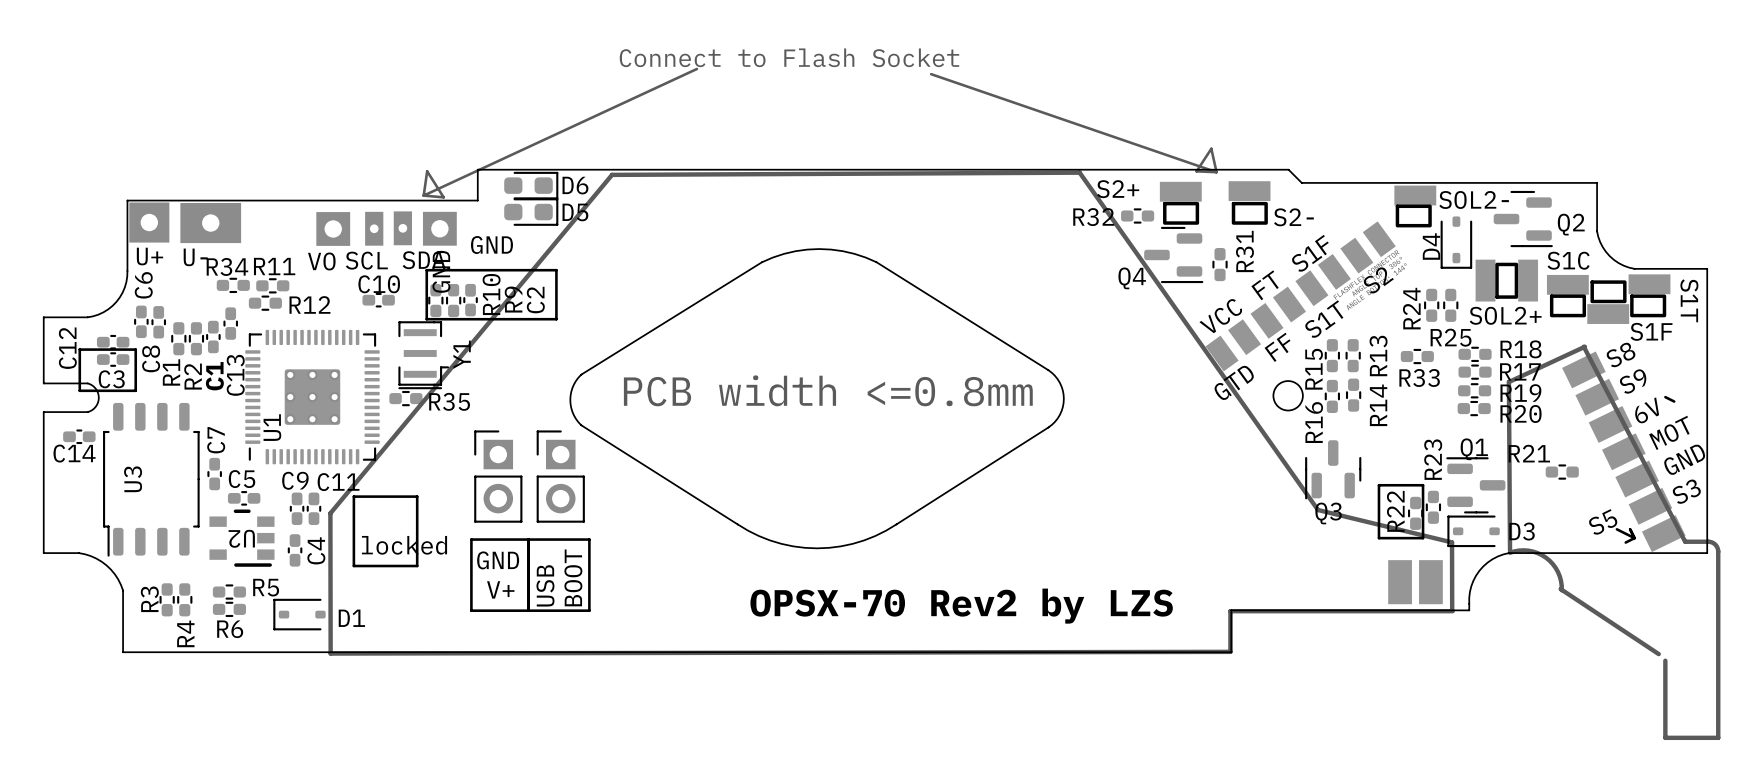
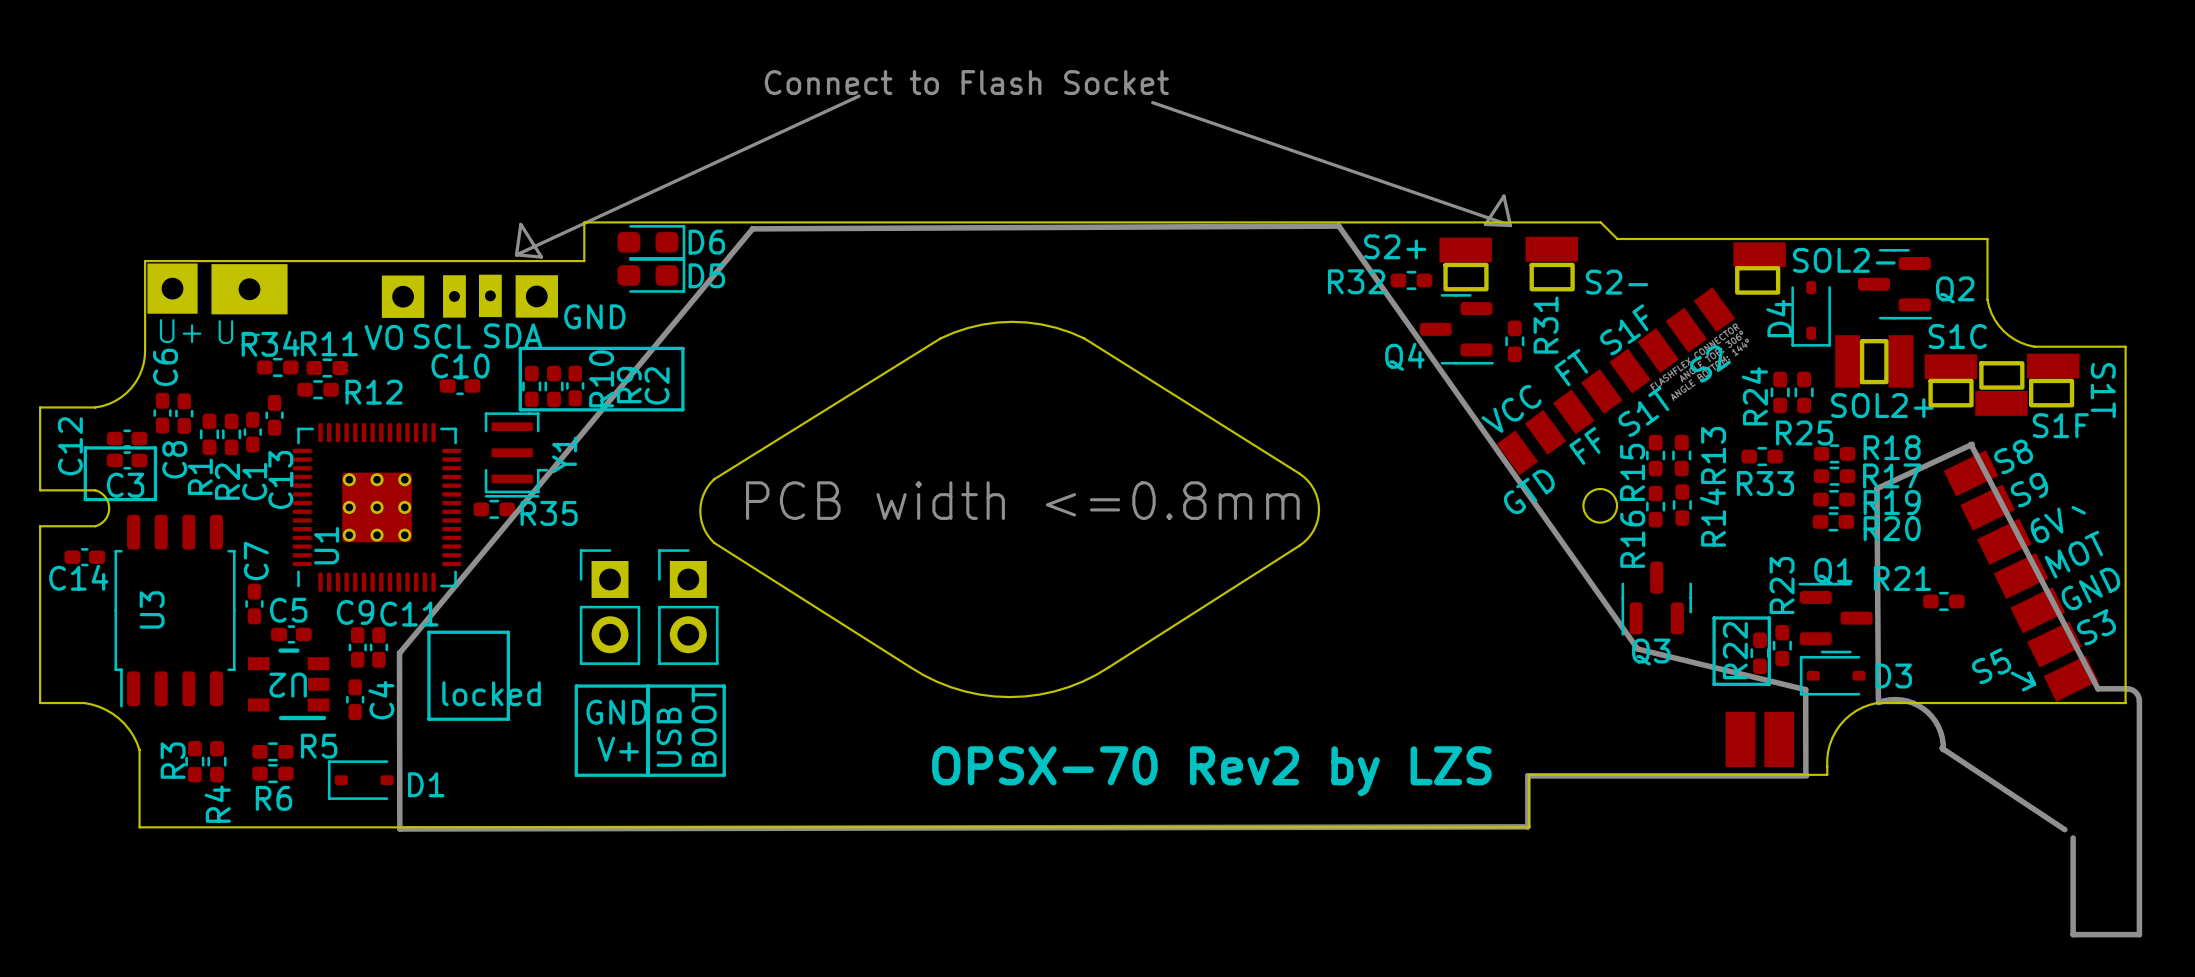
part footprint: [42, 168, 1721, 741] -> [39, 221, 2143, 938]

